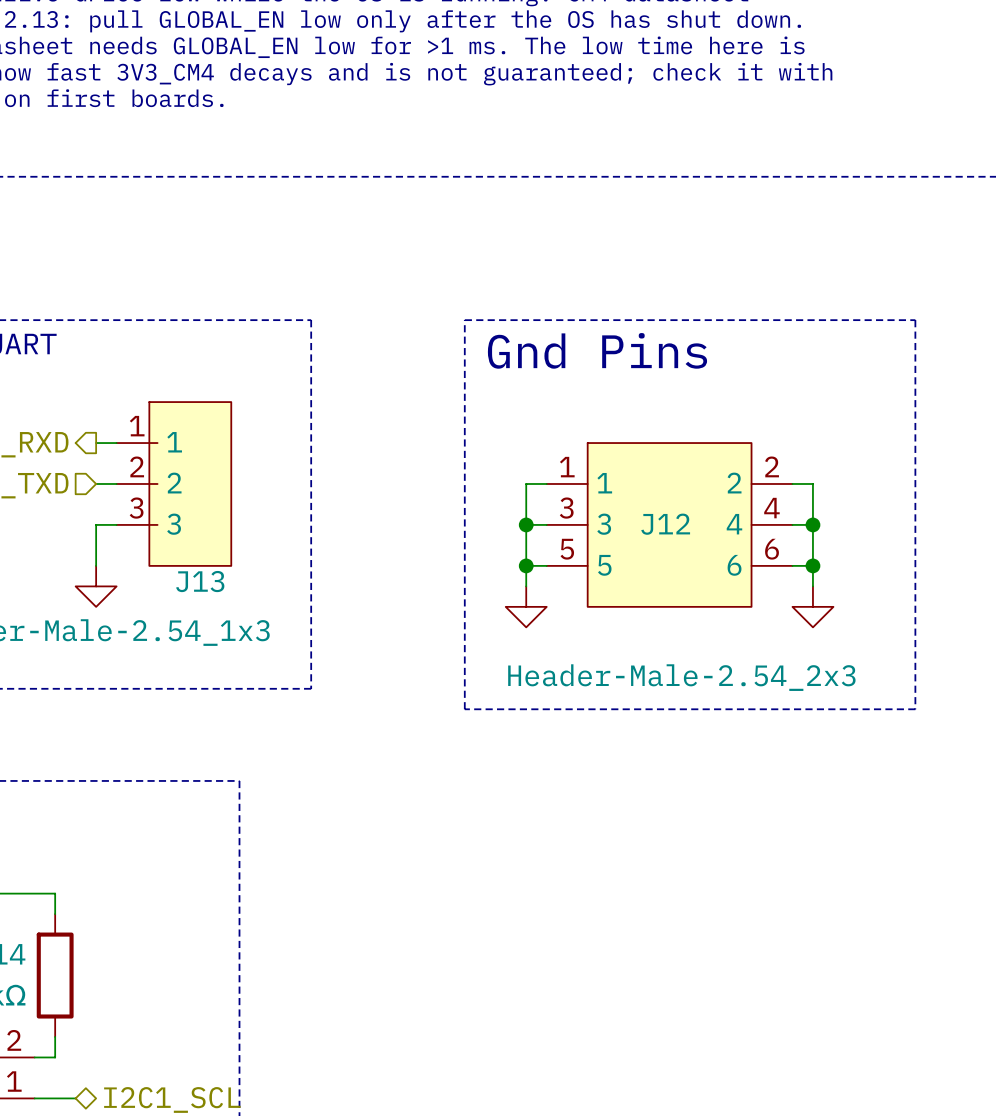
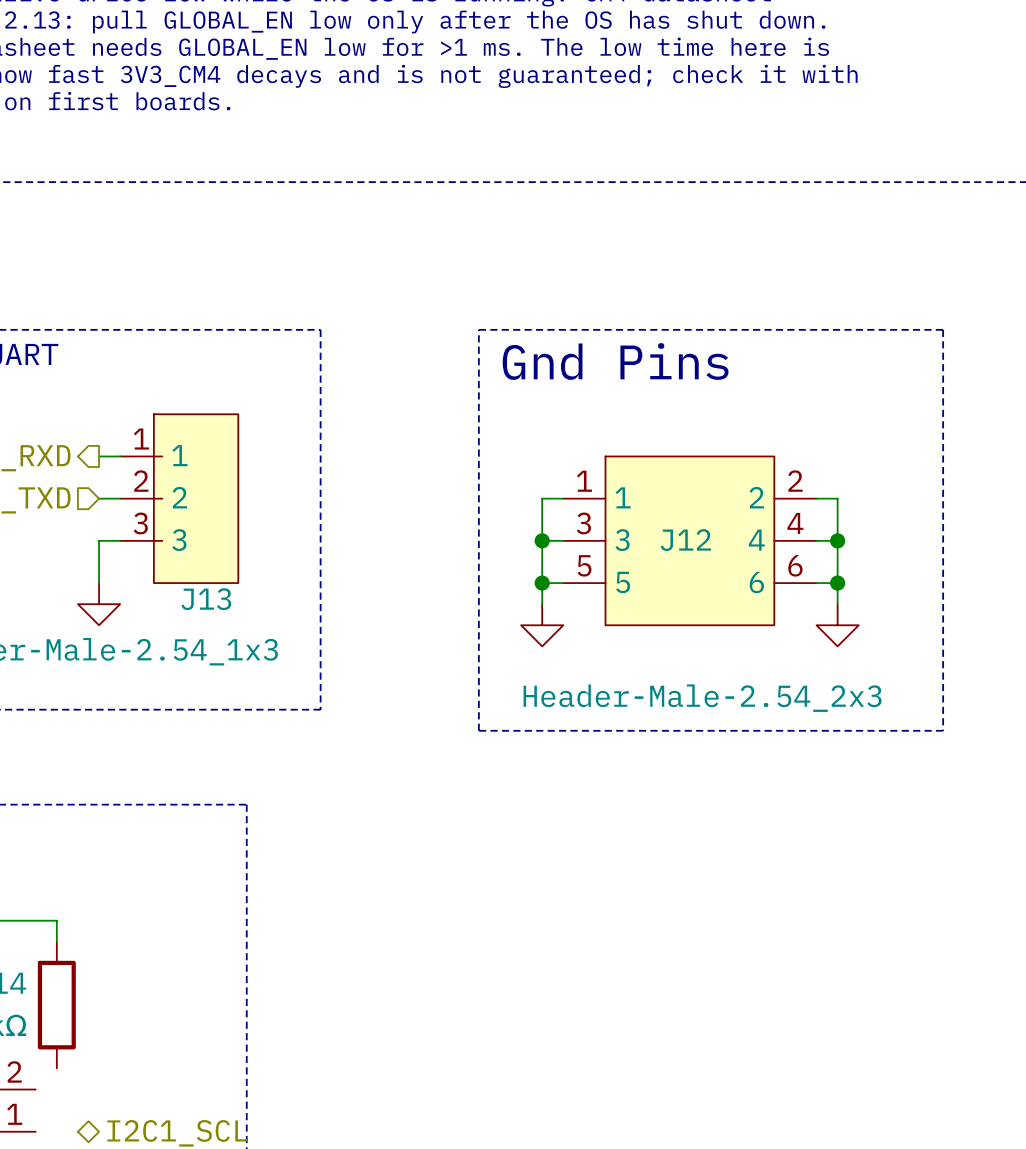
wire: (55, 1036) (55, 1057) (34, 1057) -> none
wire: (34, 1098) (75, 1098) -> none

